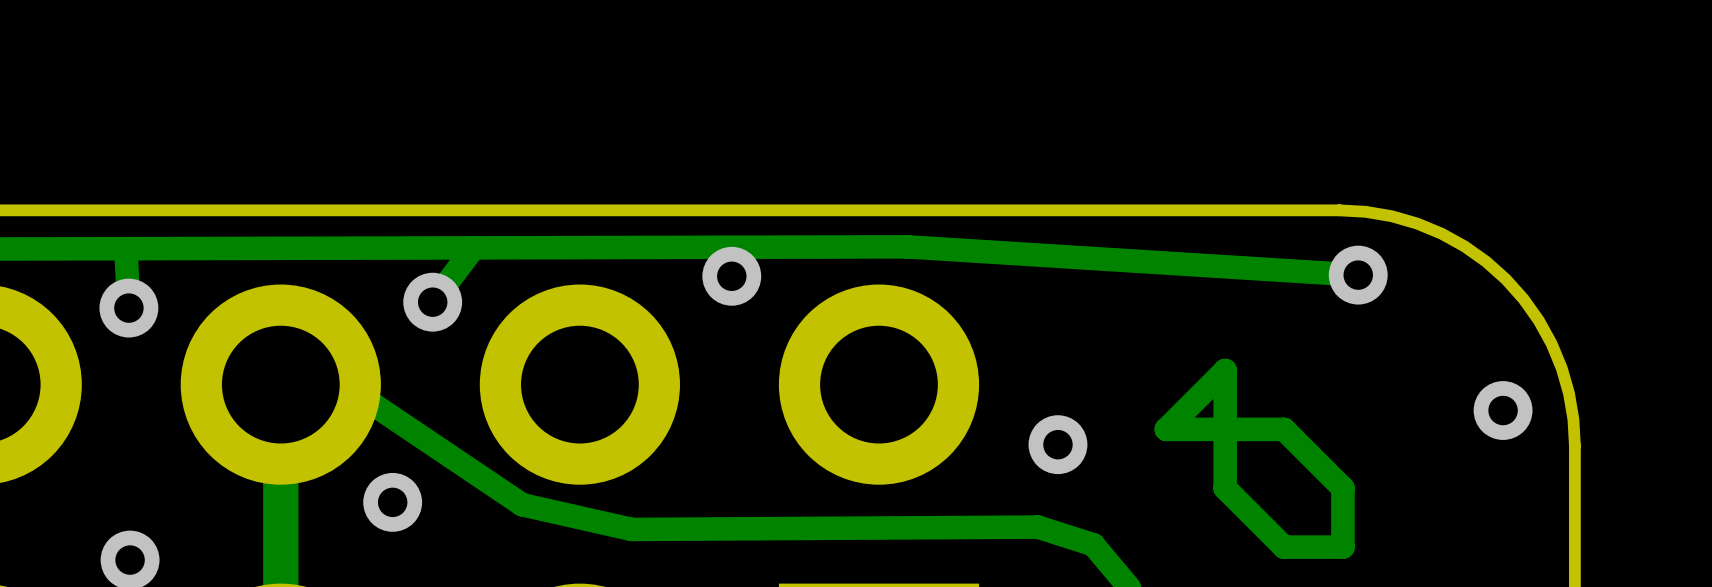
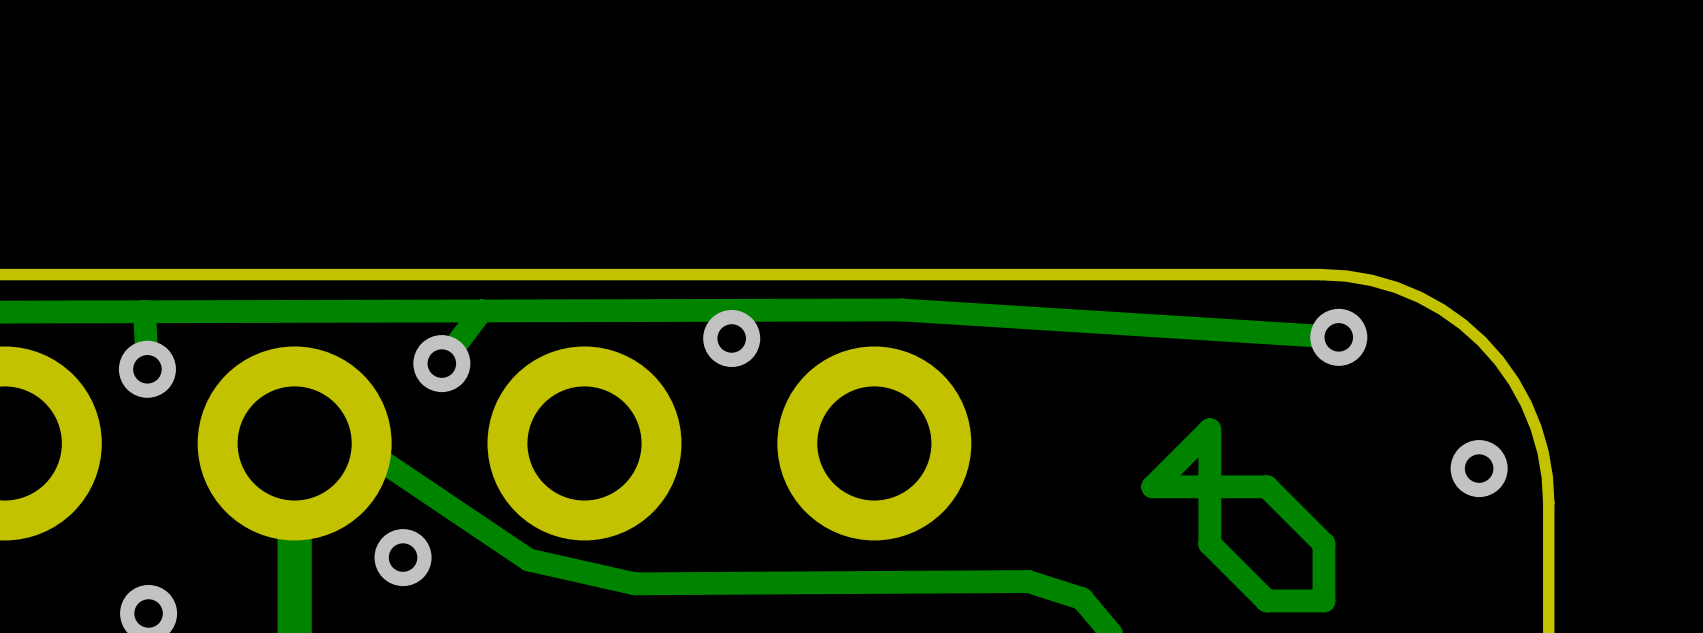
via: (1057, 444) -> none

